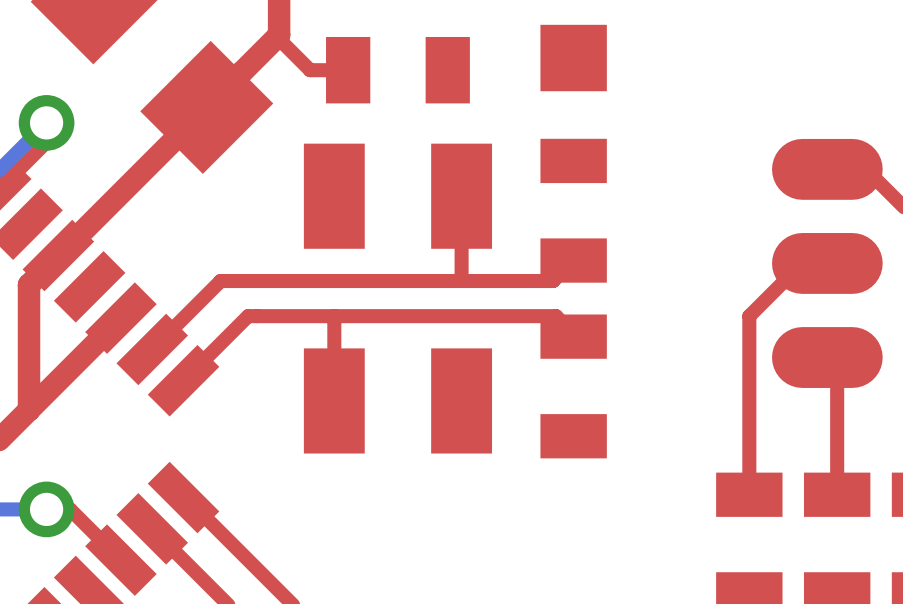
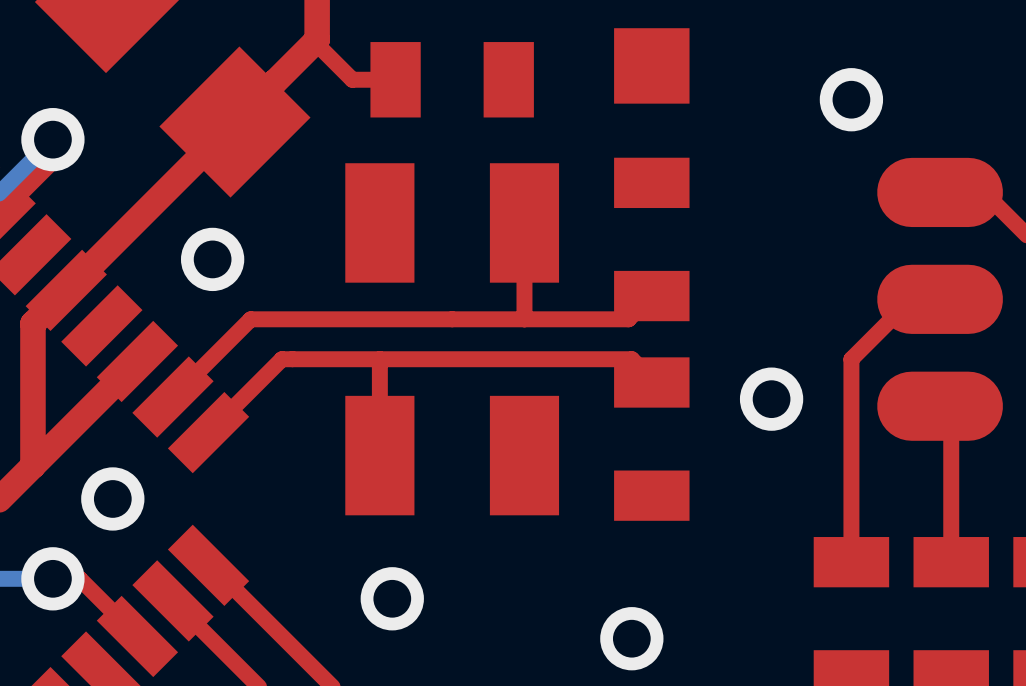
via: none -> (851, 99)
via: none -> (212, 259)
via: none -> (771, 399)
via: none -> (112, 498)
via: none -> (392, 598)
via: none -> (631, 638)

